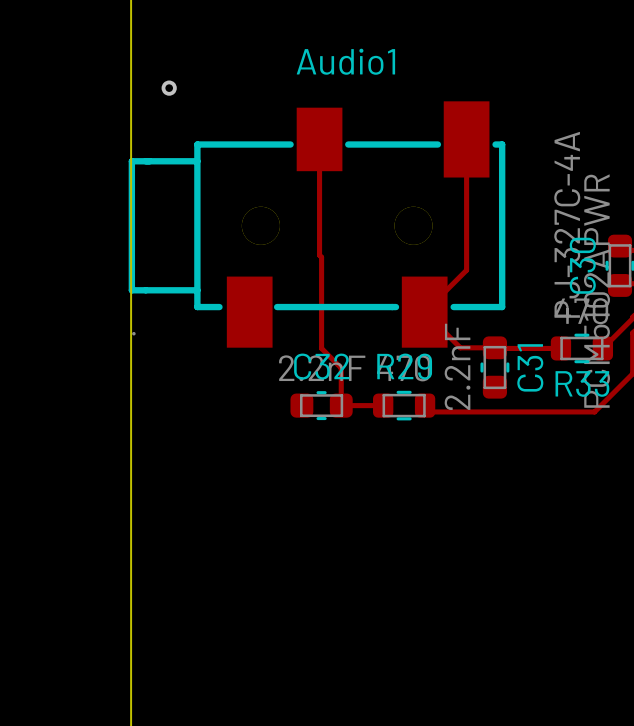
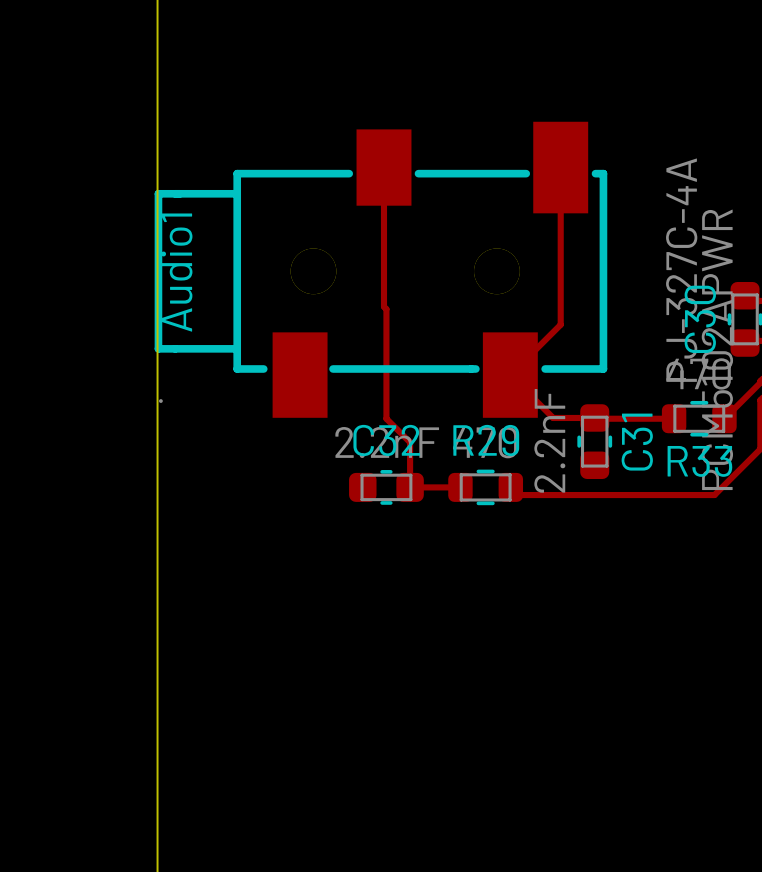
Audio1 name rotation: 0° (345, 61) -> 90° counterclockwise (176, 272)
Audio1 name position: Audio1 (345, 61) -> Audio1 (176, 272)
via: (169, 88) -> none

